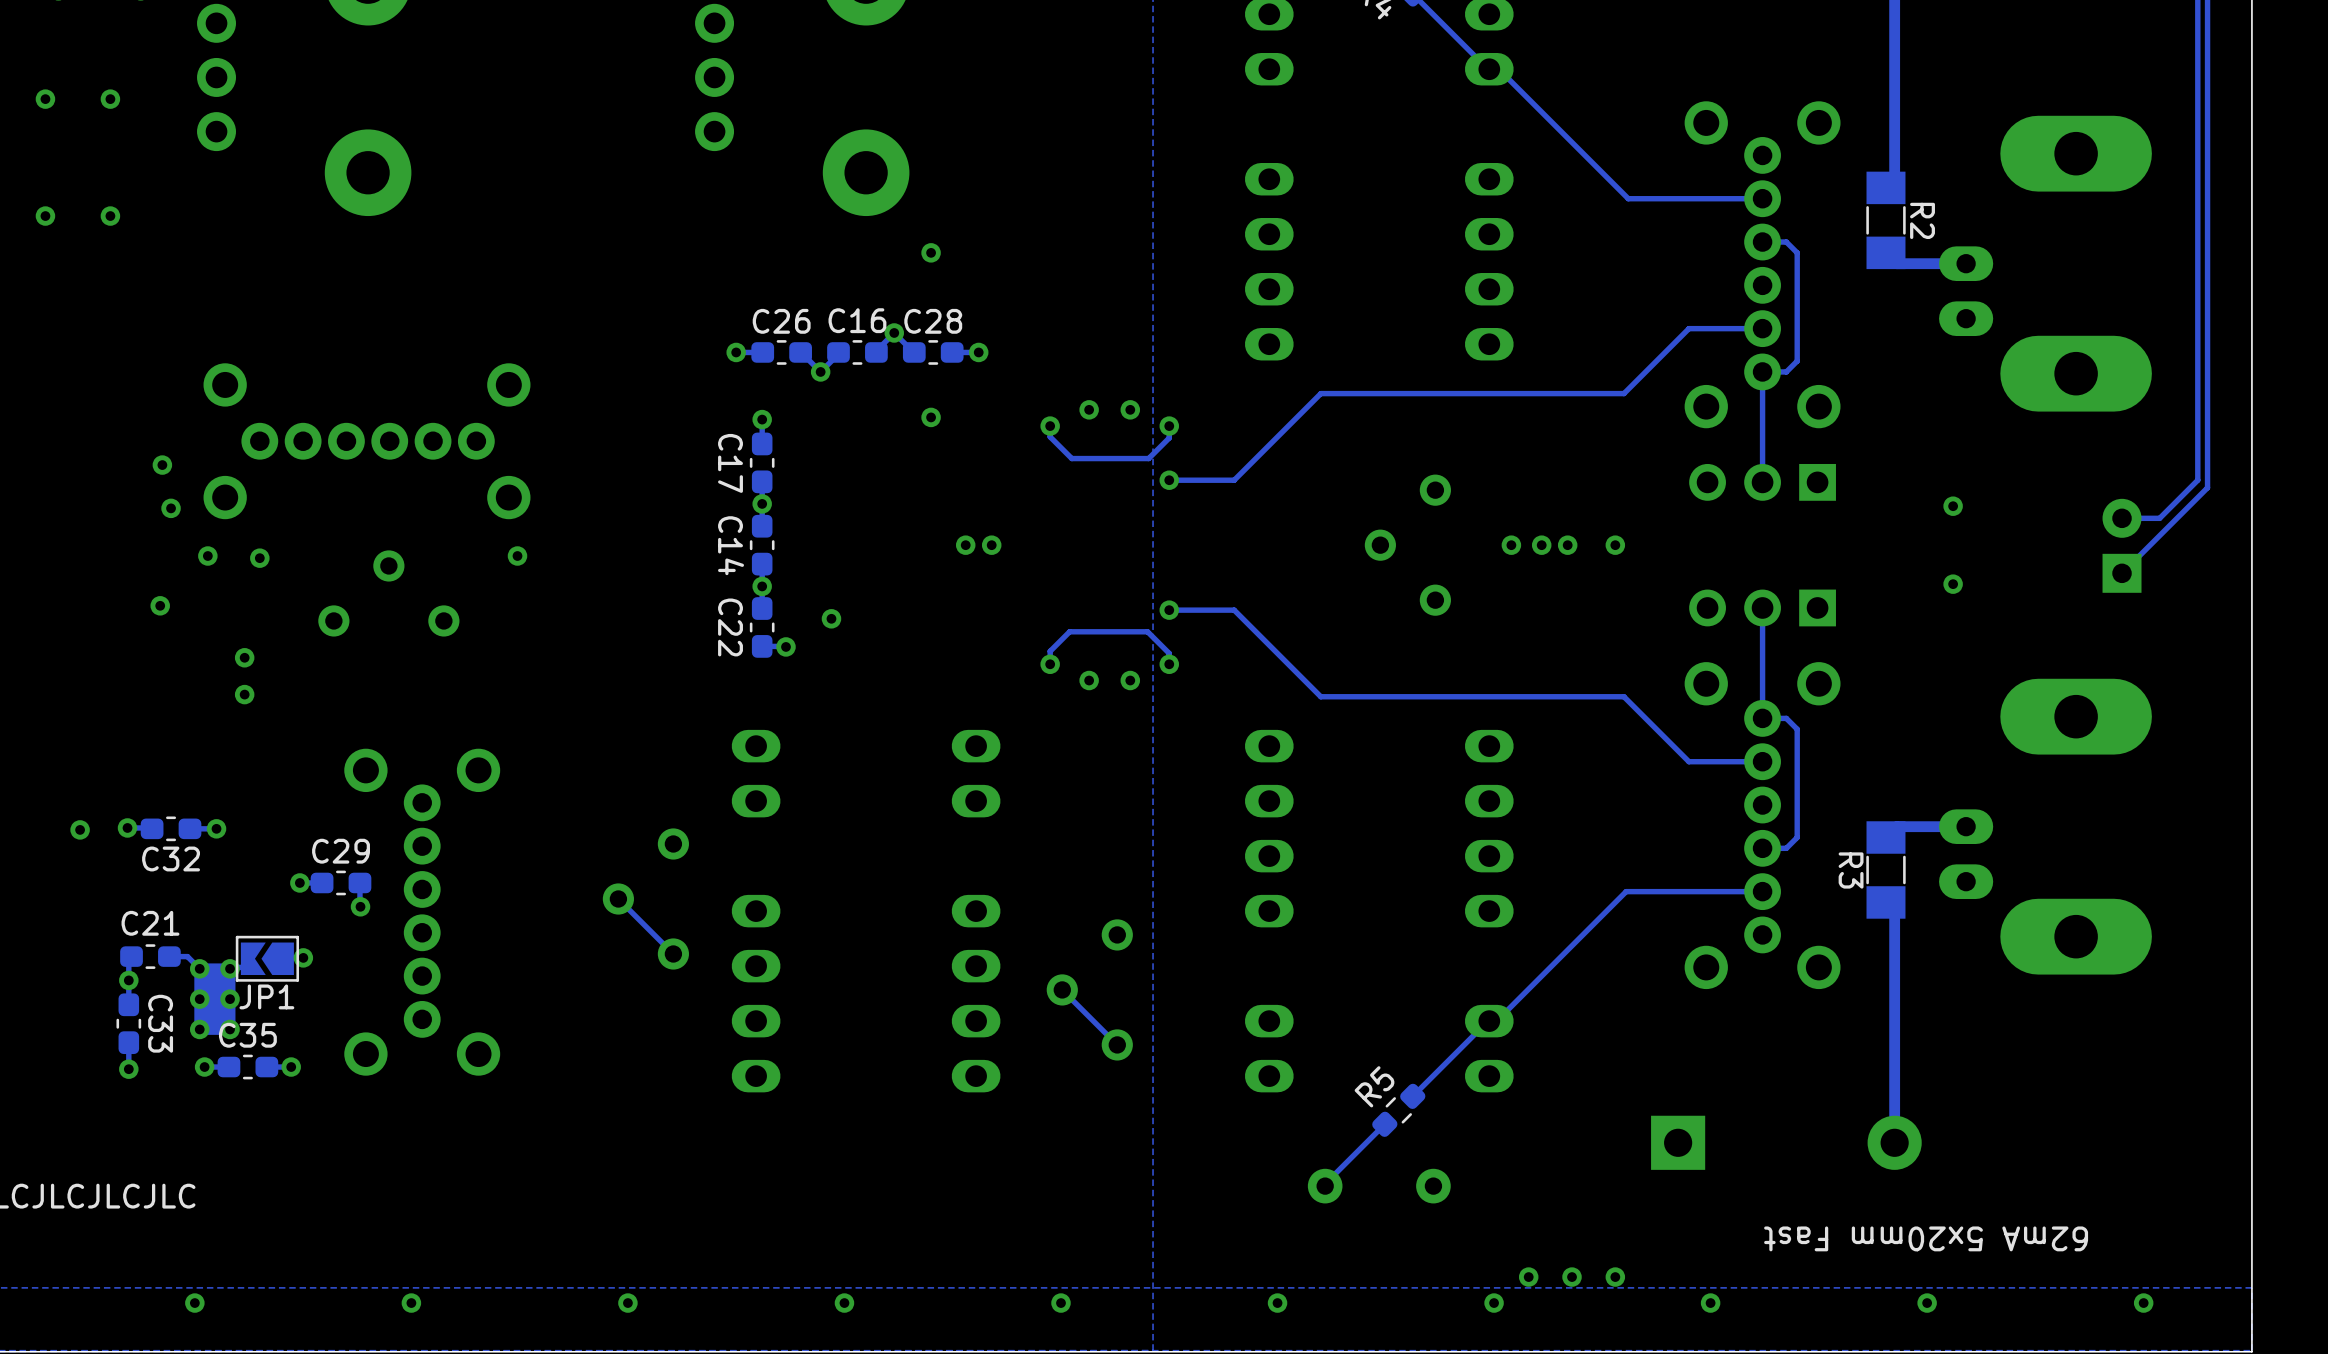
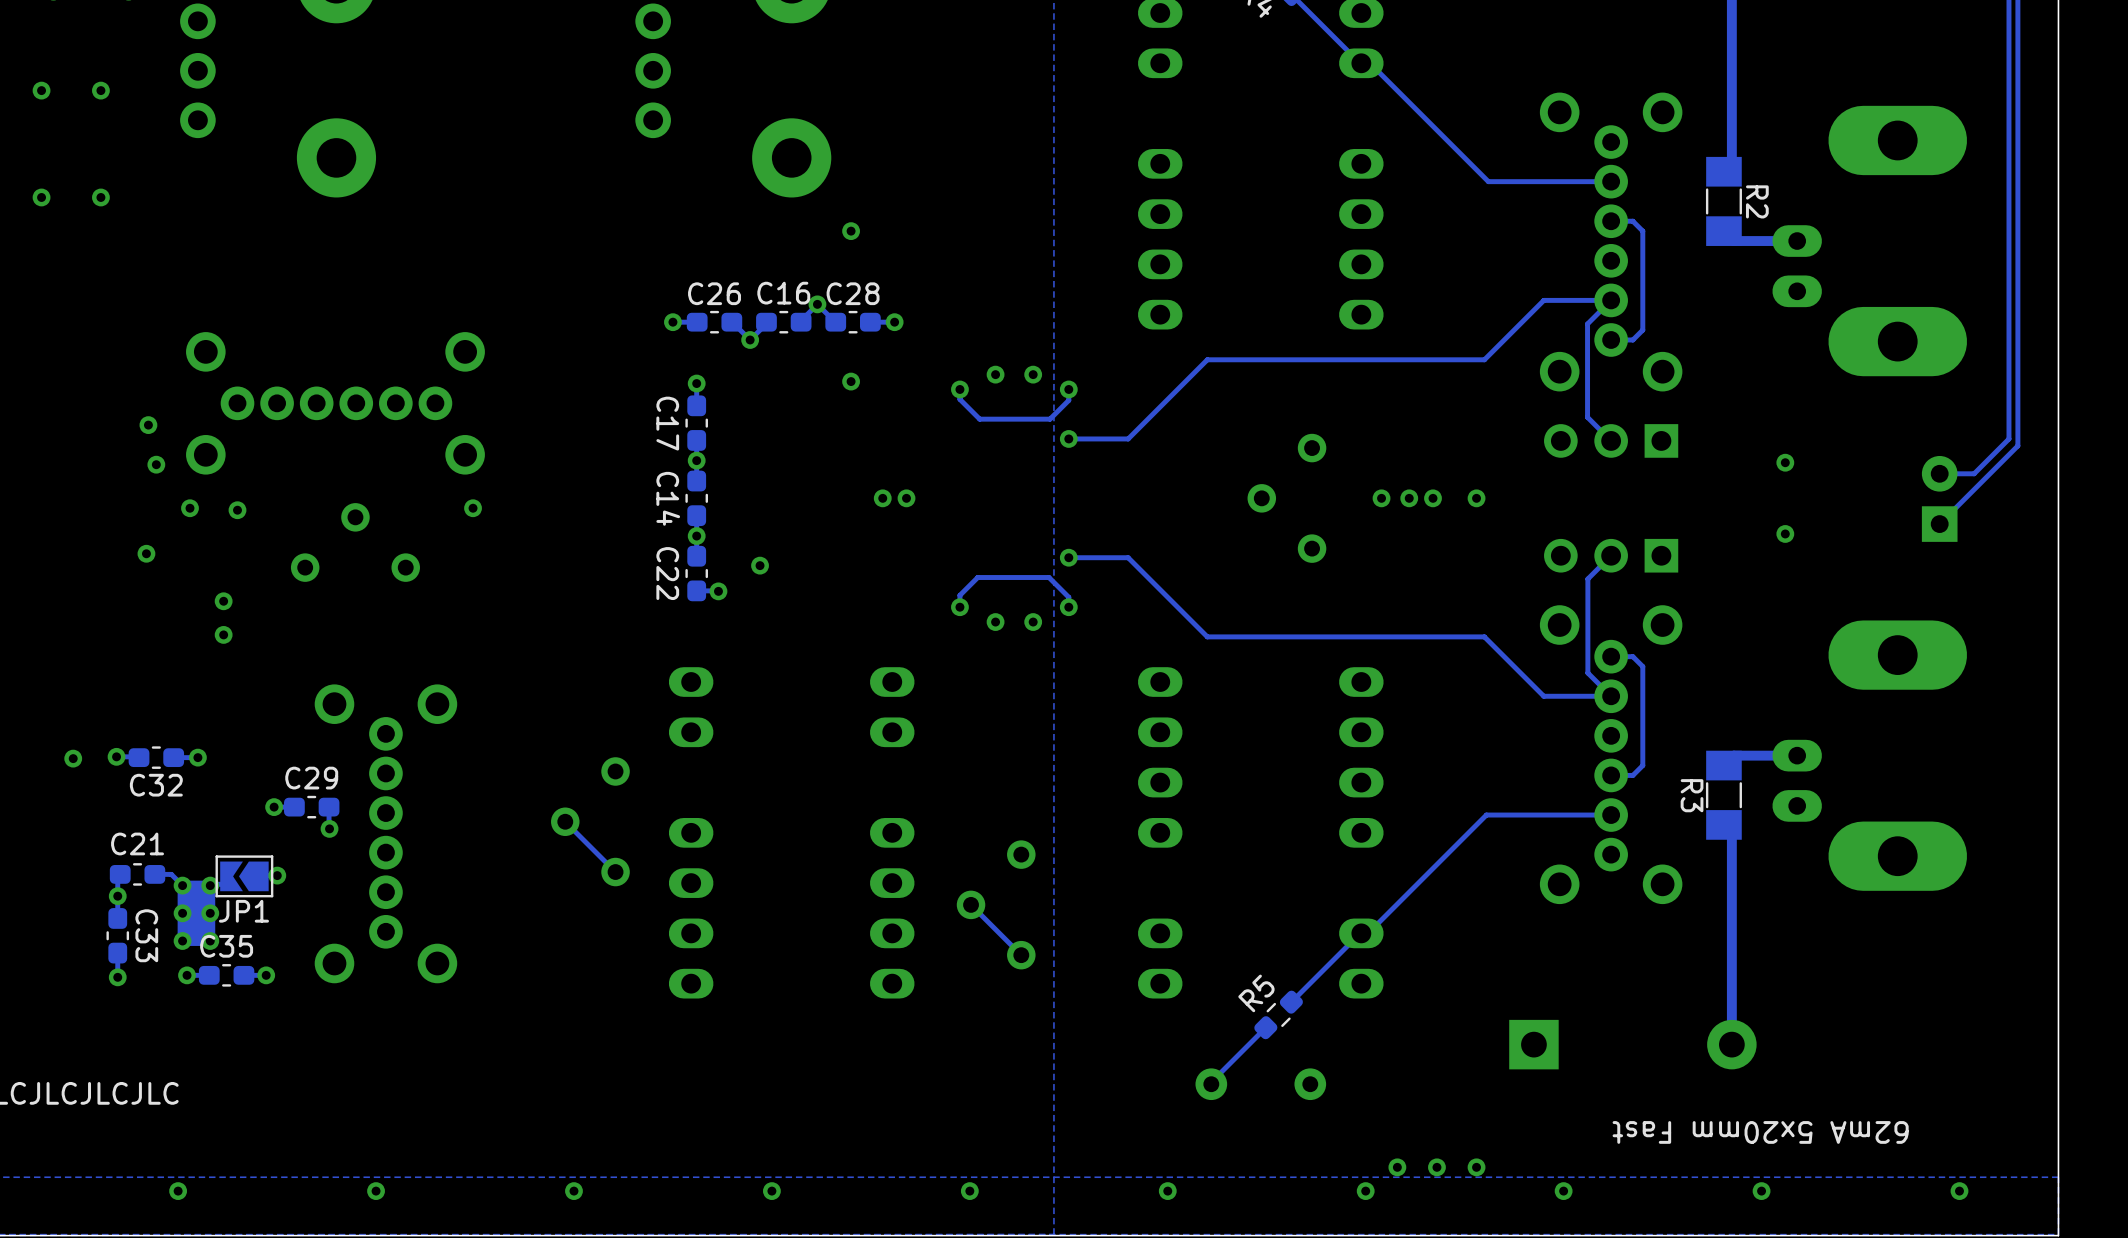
track: (1762, 371) (1762, 482) -> (1611, 300) (1587, 324) (1587, 417) (1611, 440)
track: (1762, 607) (1762, 718) -> (1611, 555) (1587, 578) (1587, 673) (1611, 696)

